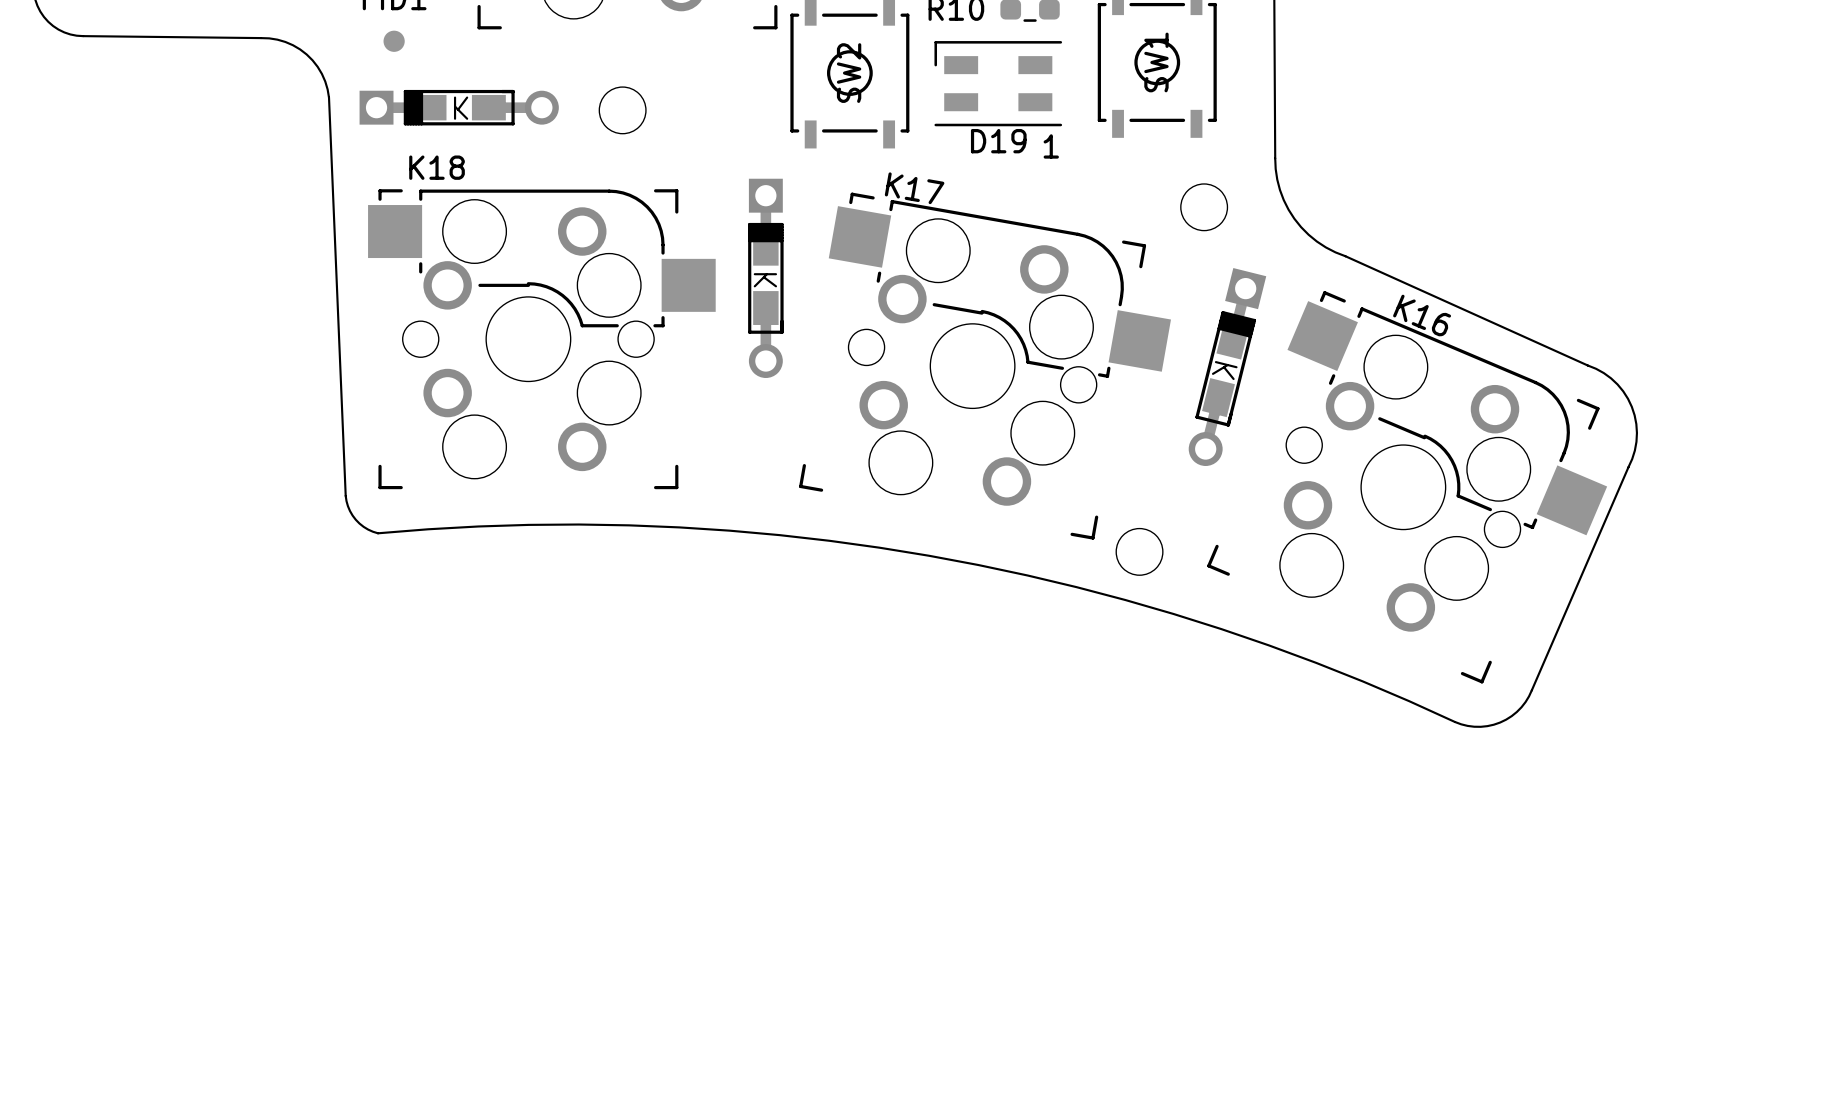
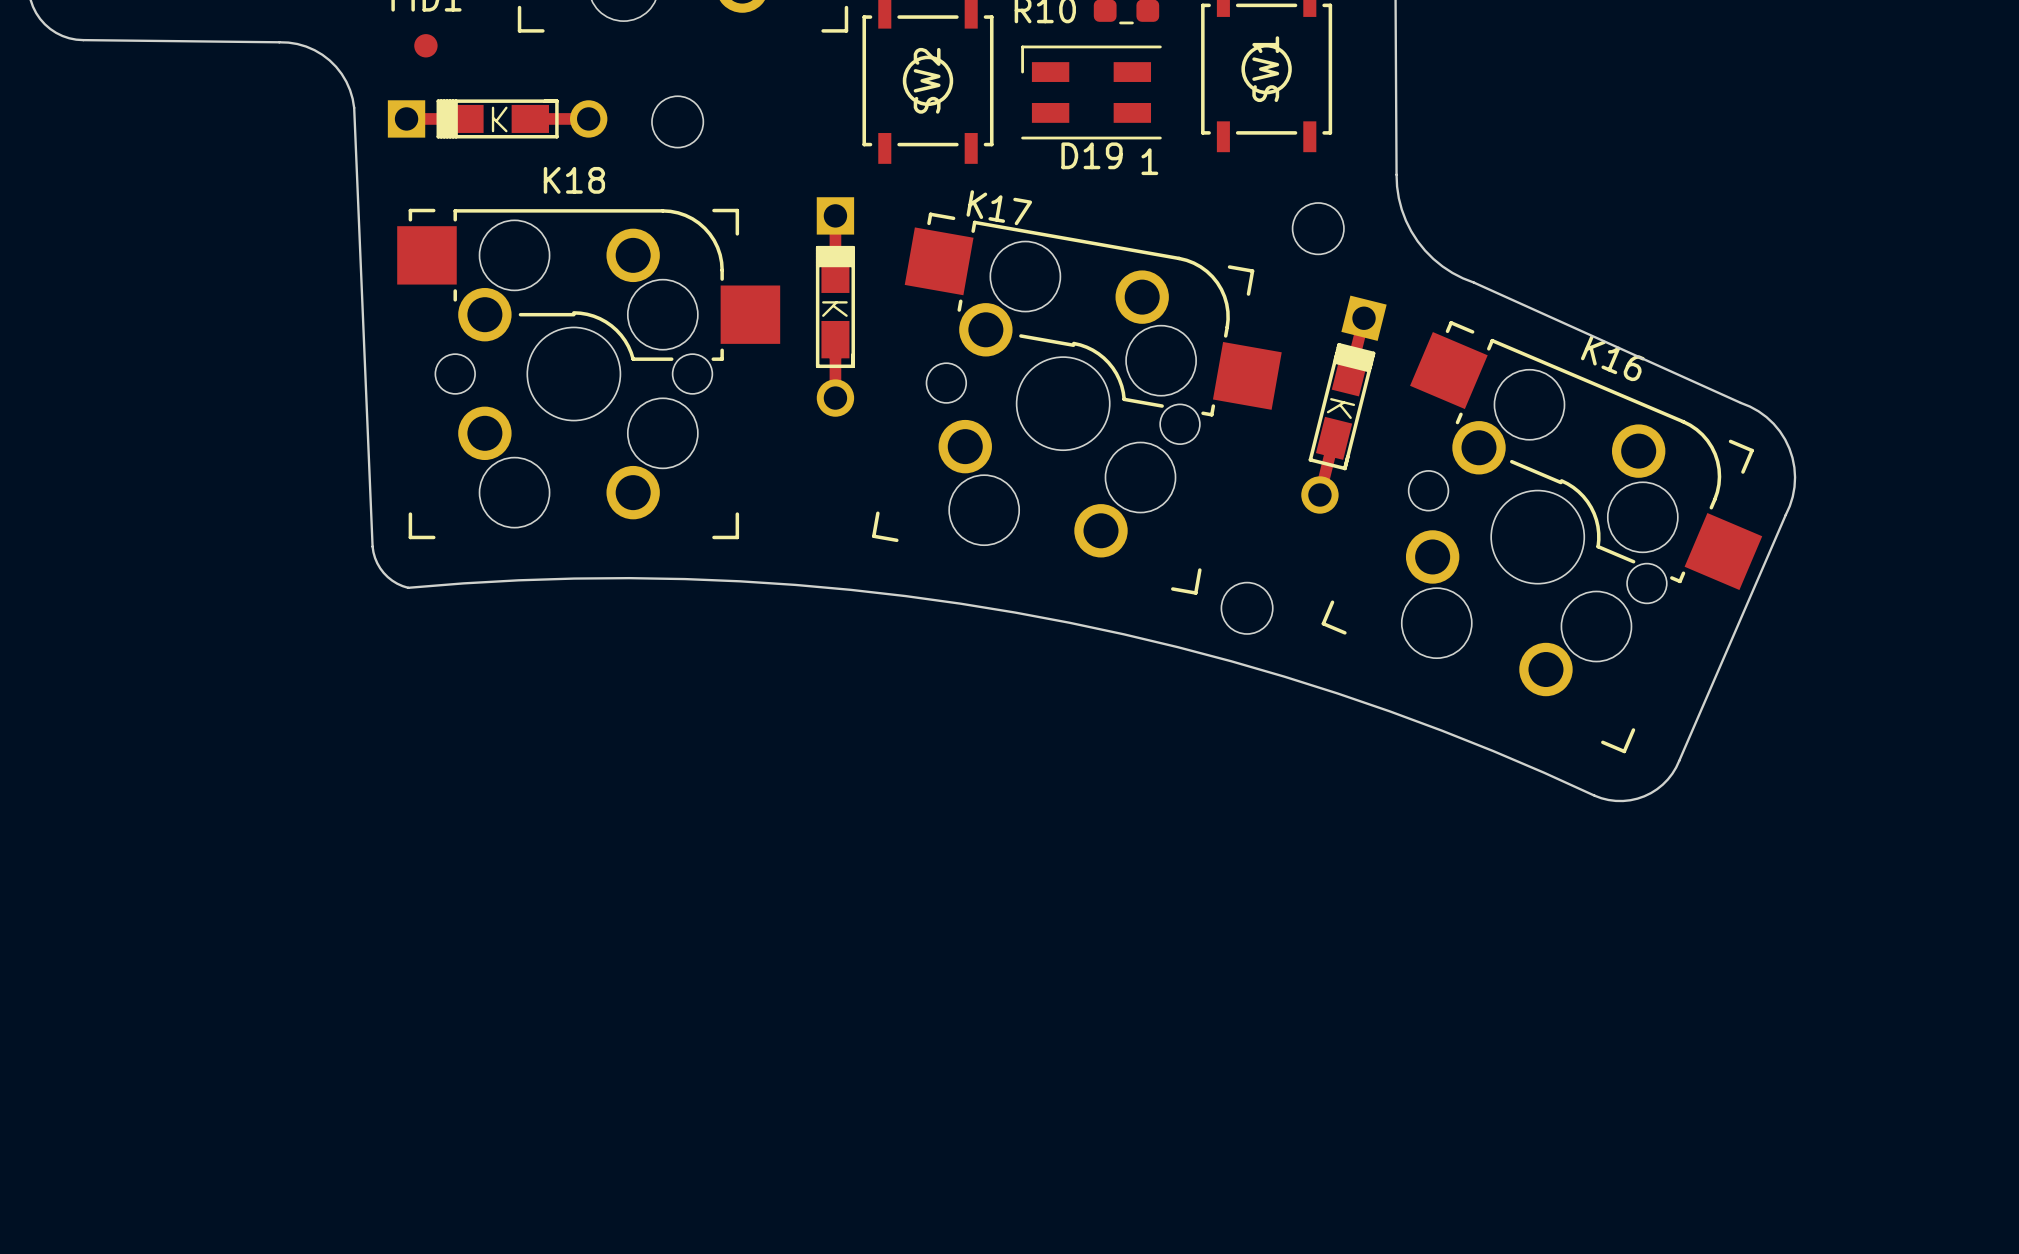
K18 name position: K18 (437, 167) -> K18 (574, 180)
K16 name position: K16 (1422, 315) -> K16 (1612, 358)

